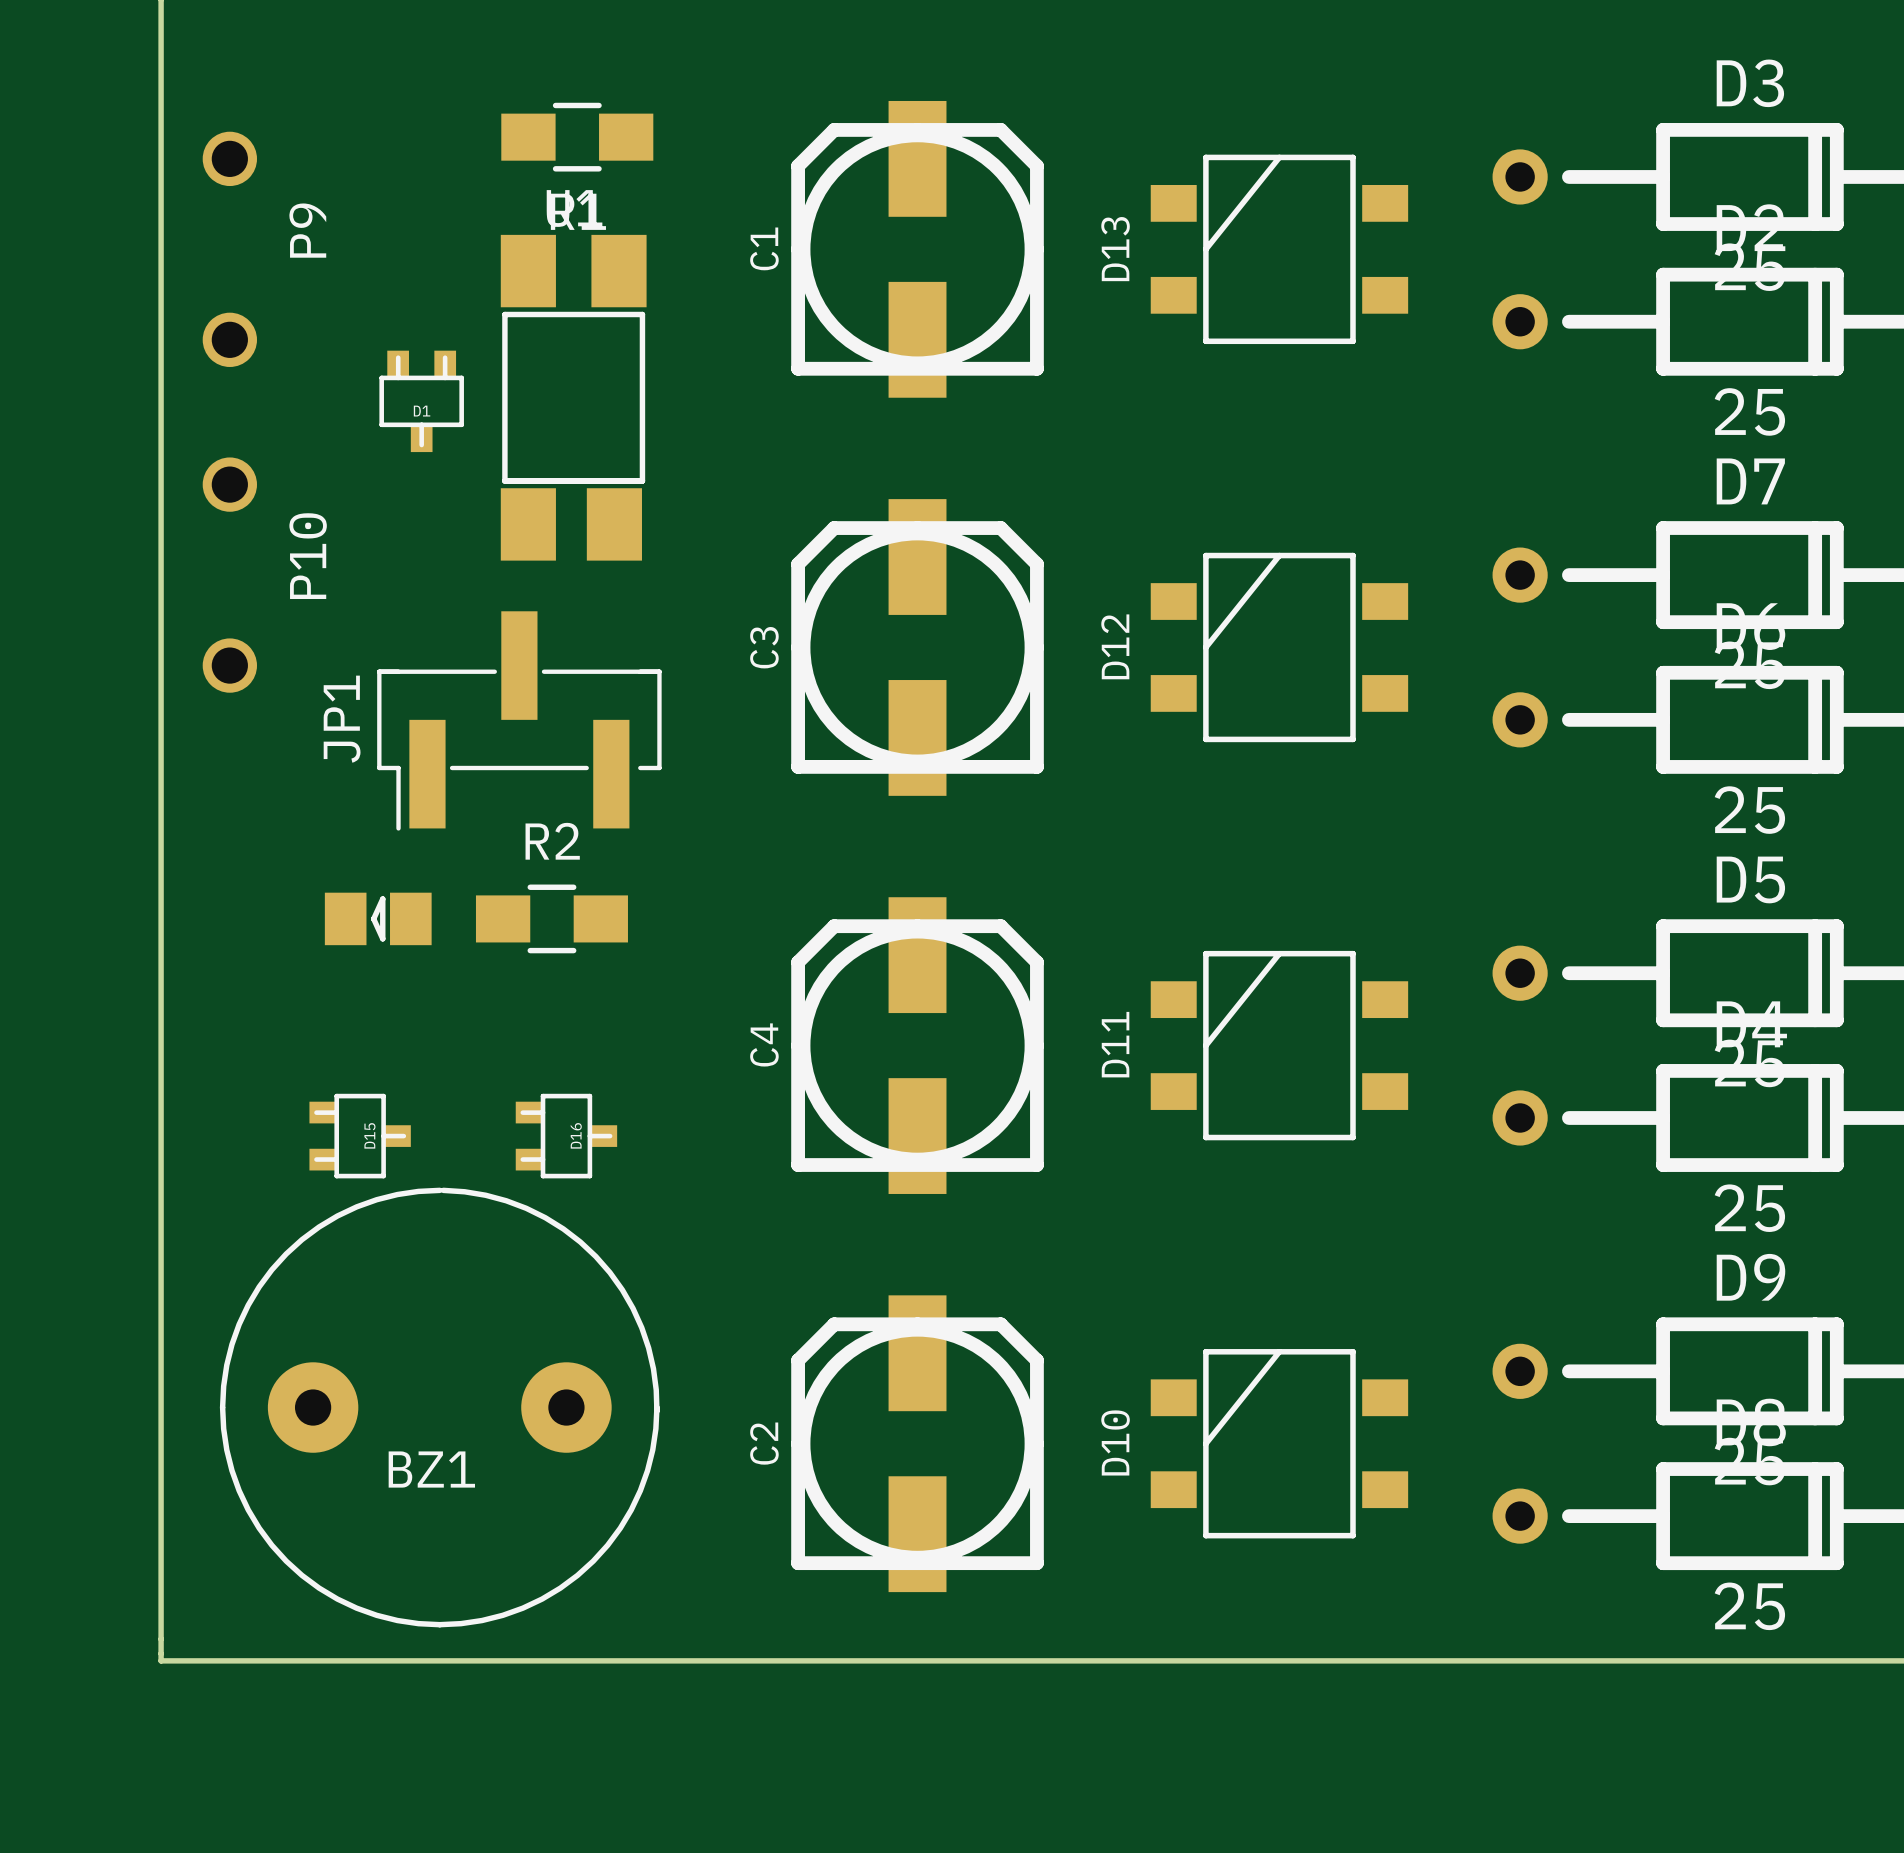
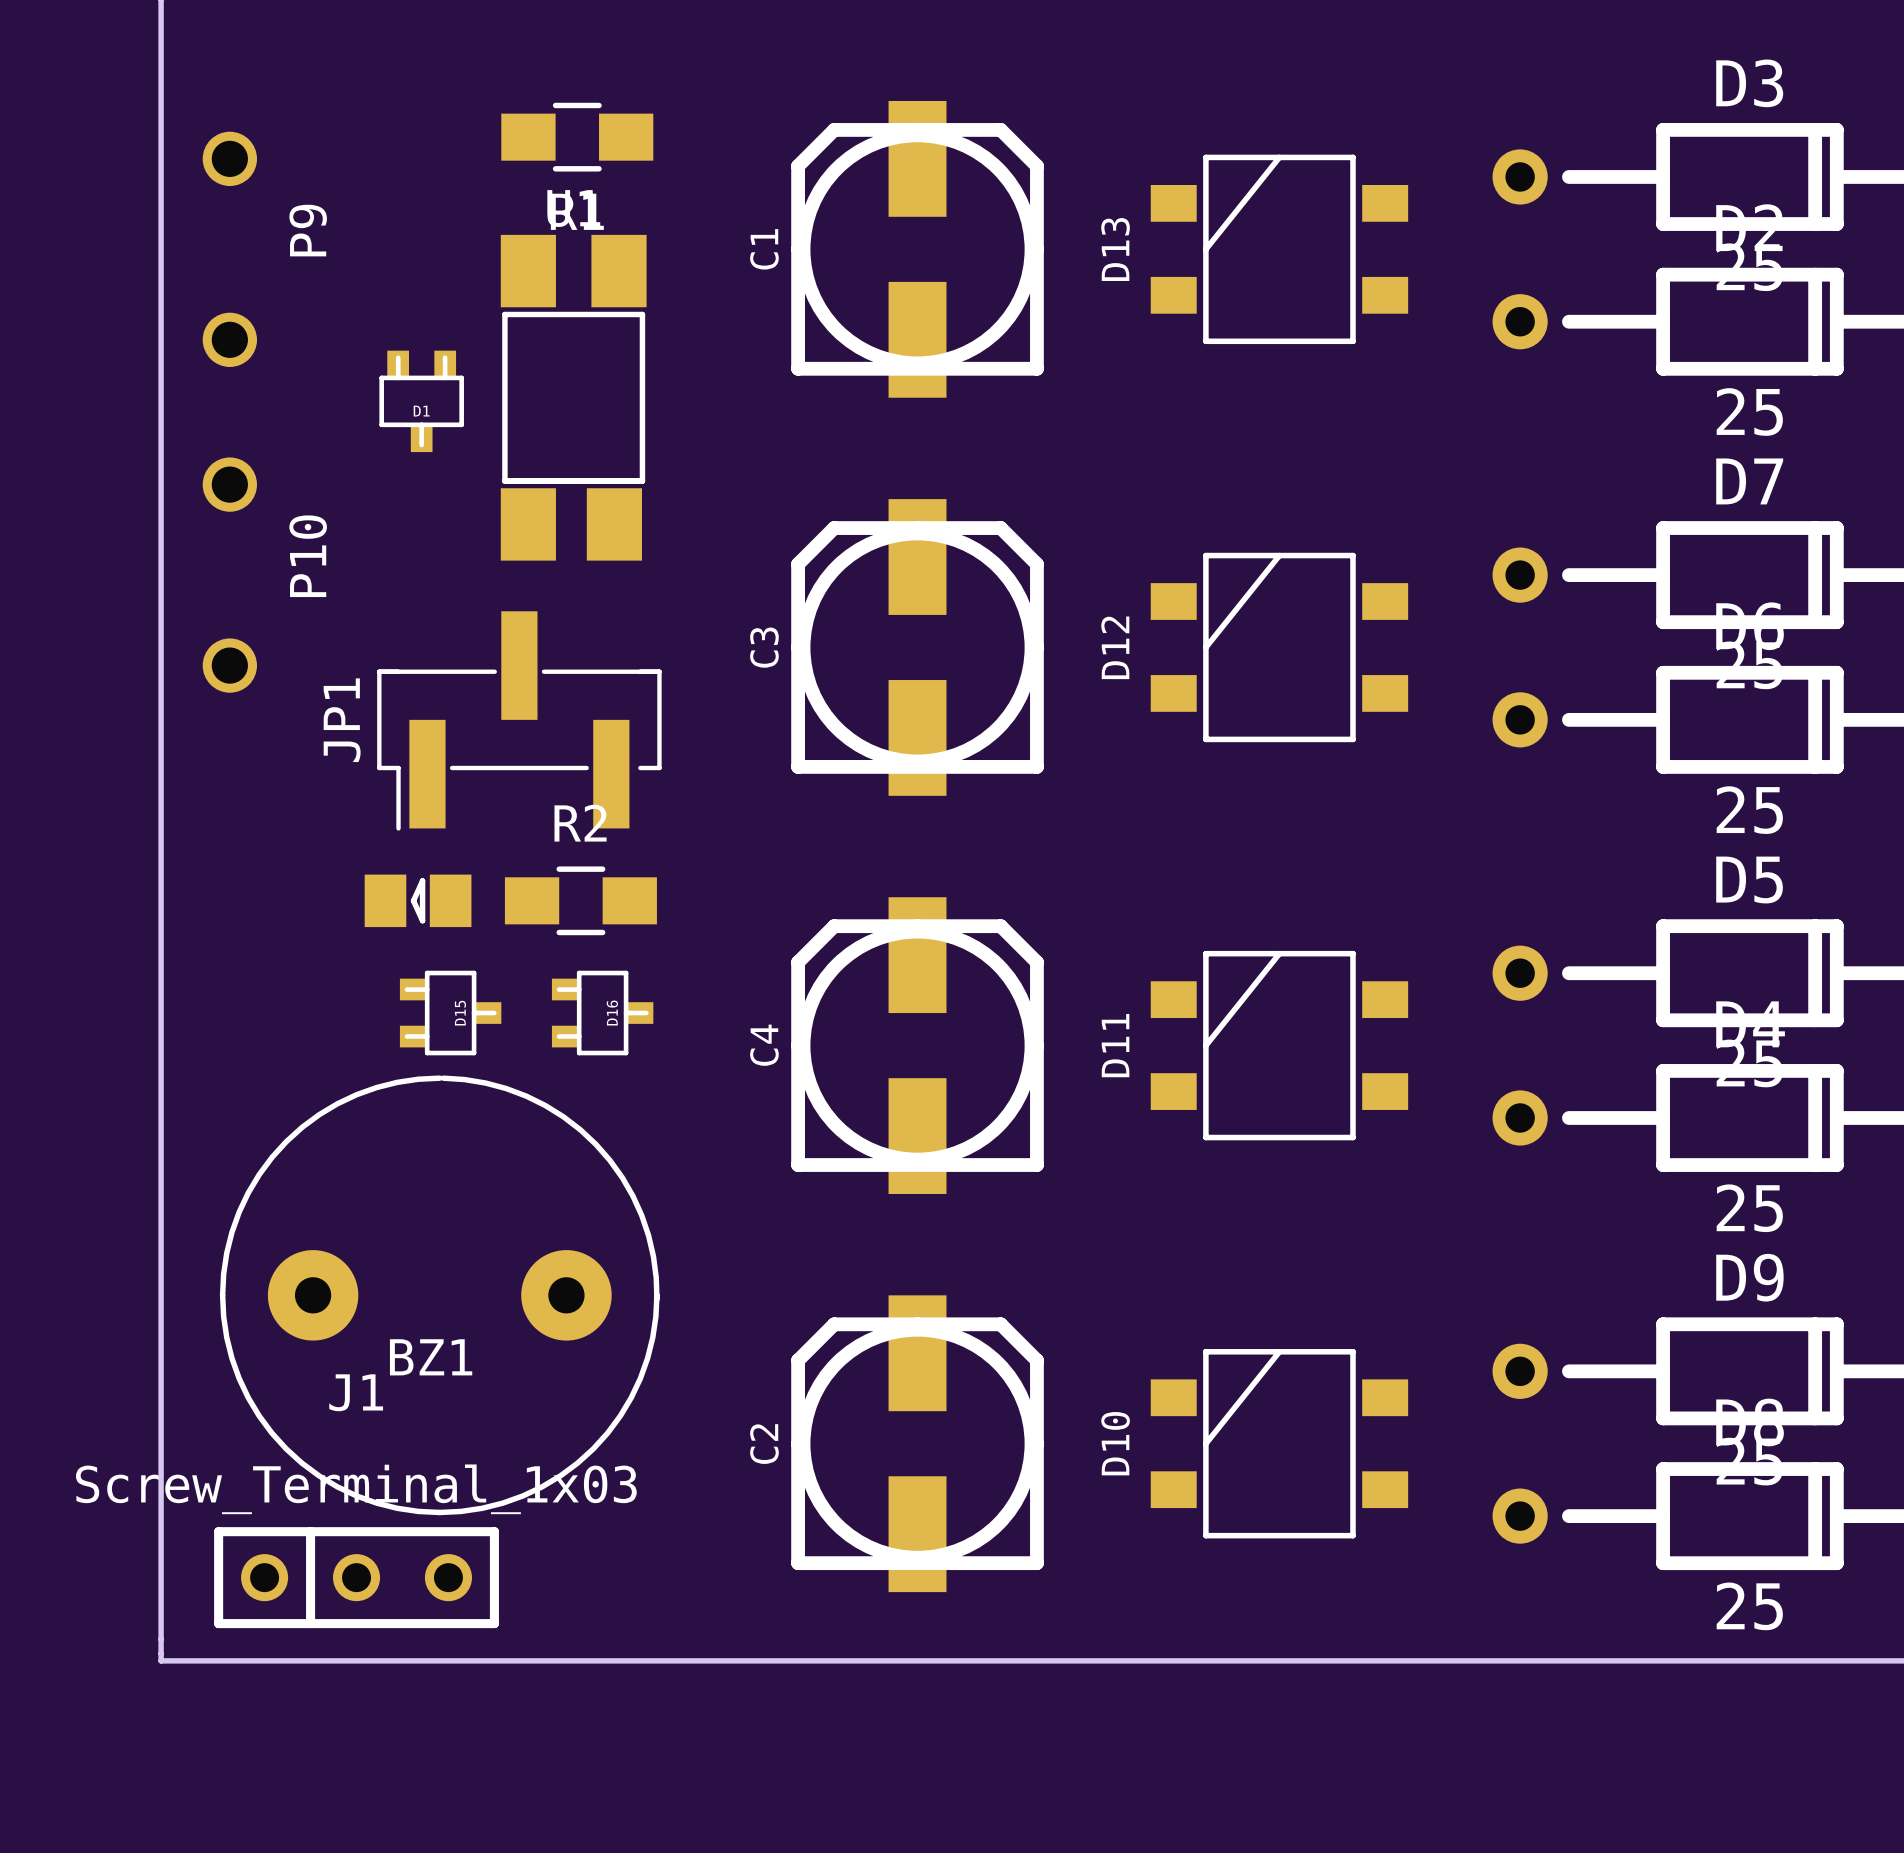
part position: (378, 918) -> (418, 900)
R2 position: (551, 918) -> (580, 900)
D15 position: (360, 1136) -> (450, 1013)
D16 position: (566, 1136) -> (602, 1013)
BZ1 position: (439, 1407) -> (439, 1295)
J1: none -> Screw_Terminal_1x03 (356, 1577)

